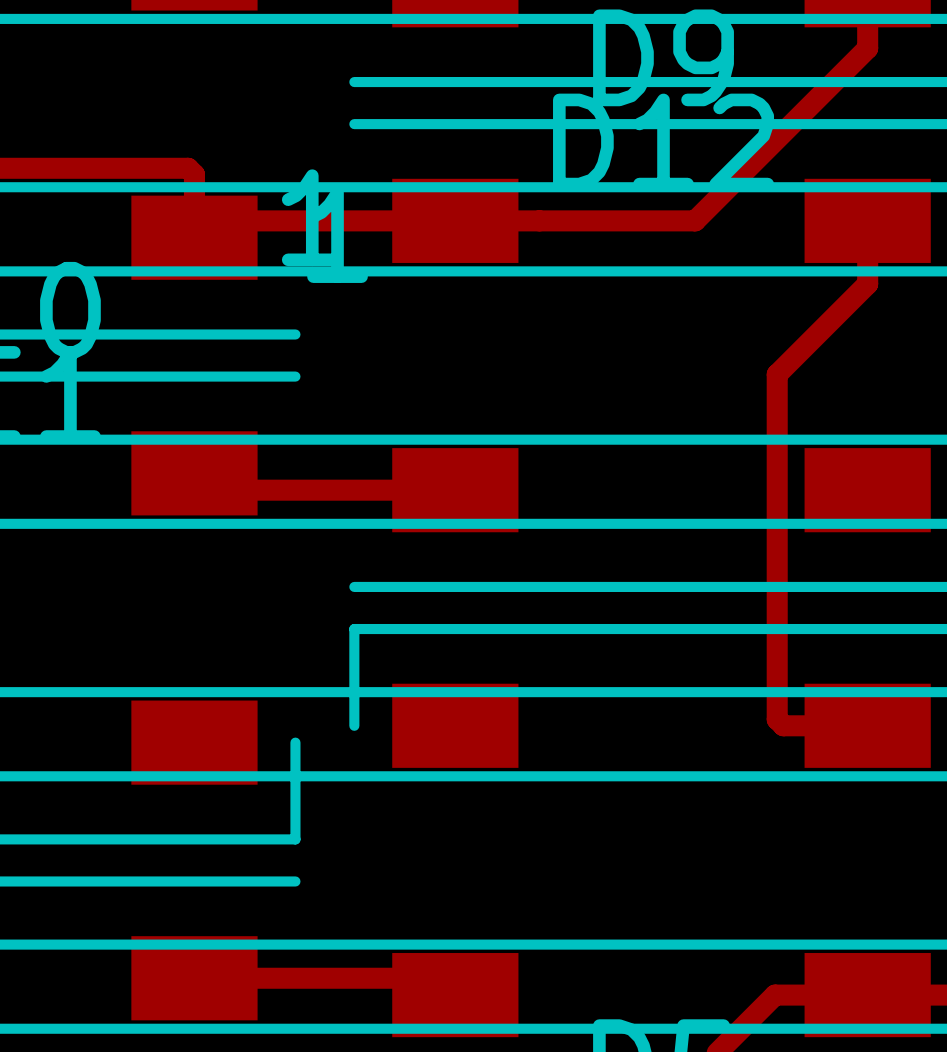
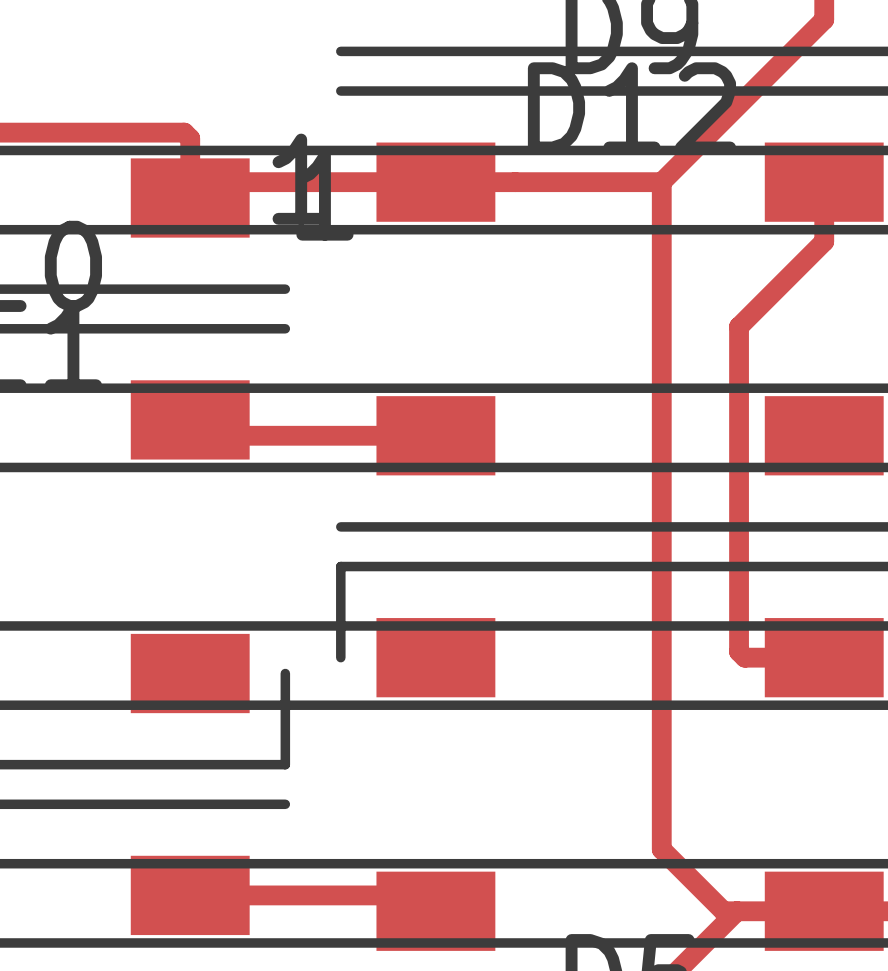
track: none -> (661, 182) (661, 849) (723, 911) (737, 911)

